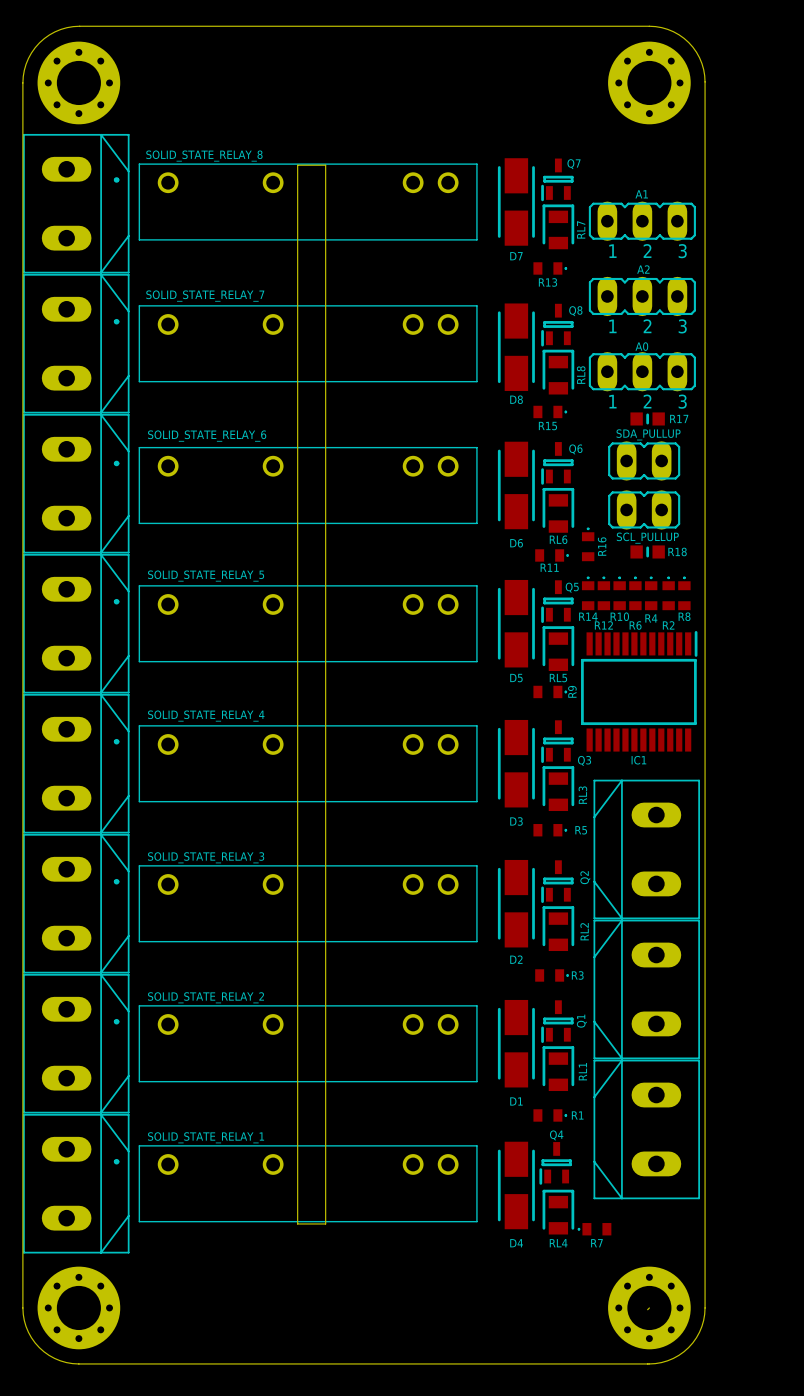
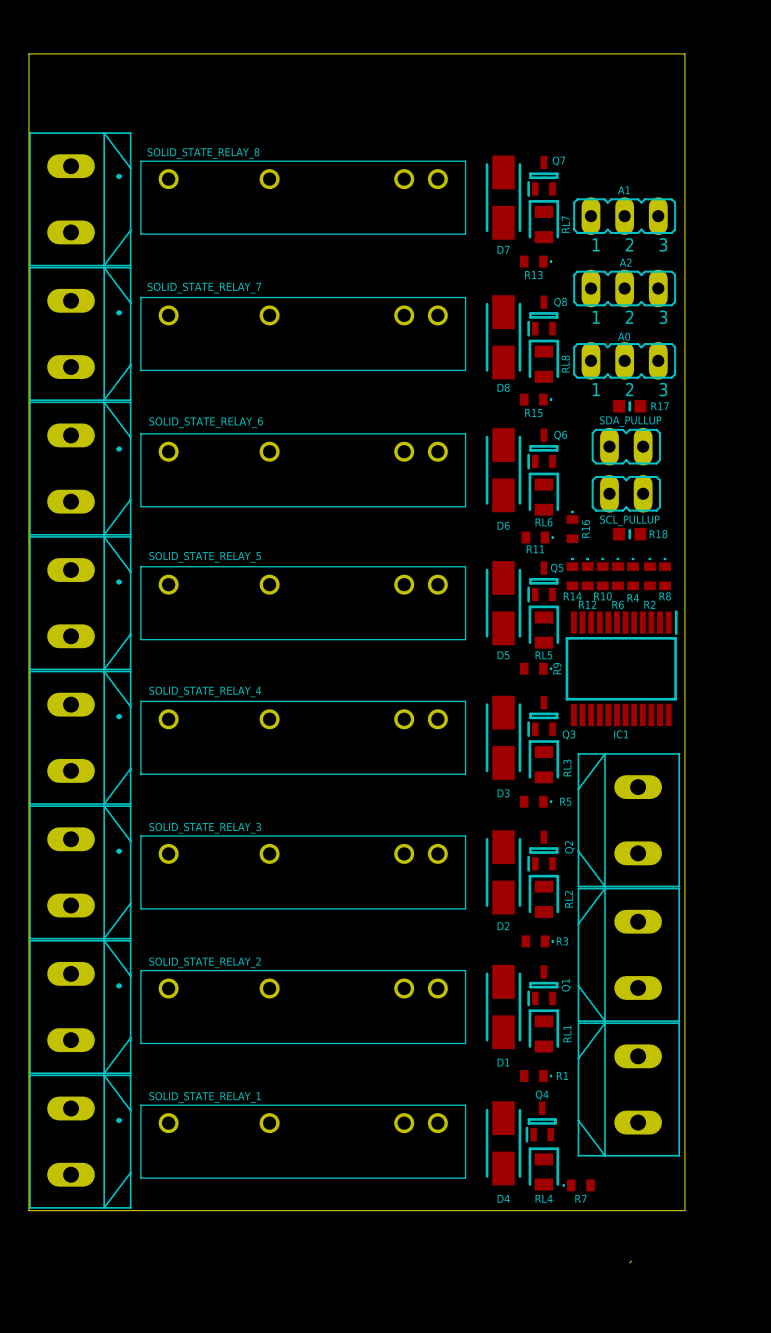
board edge: (22, 82) (26, 64) (39, 42) (60, 29) (79, 26) (649, 26) (673, 31) (684, 38) (696, 52) (701, 63) (705, 81) (704, 1314) (699, 1332) (688, 1347) (673, 1358) (655, 1363) (72, 1363) (60, 1360) (43, 1351) (28, 1332) (23, 1314) (22, 1255) -> (28, 83) (28, 53) (684, 53) (684, 1210) (28, 1210)
part: (78, 82) -> none
part: (649, 82) -> none
board edge: (297, 165) (297, 1223) (325, 1223) (325, 165) (297, 165) -> none
part: (78, 1307) -> none
part: (649, 1307) -> none

